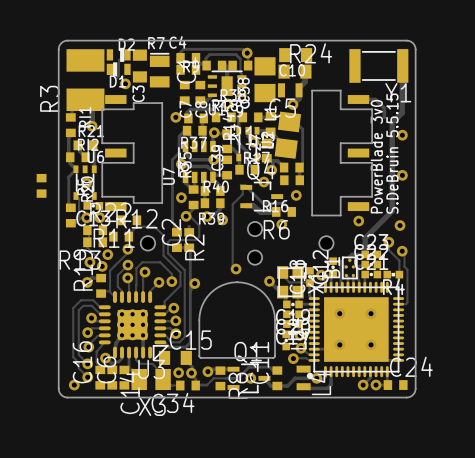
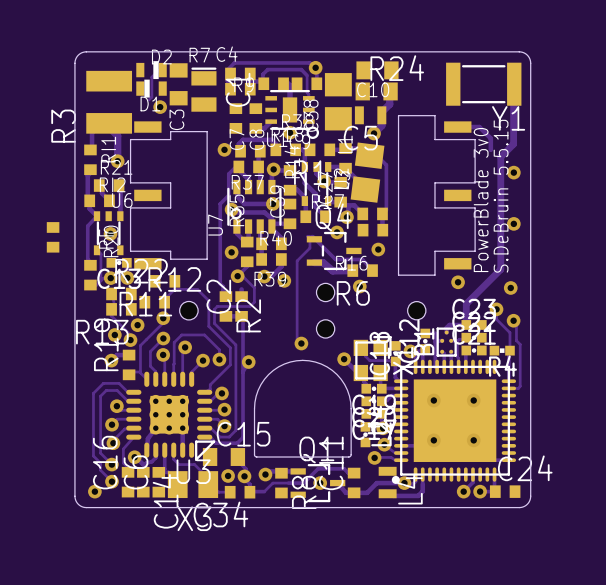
R3 footprint: [66, 49, 105, 112] -> [86, 70, 133, 134]

